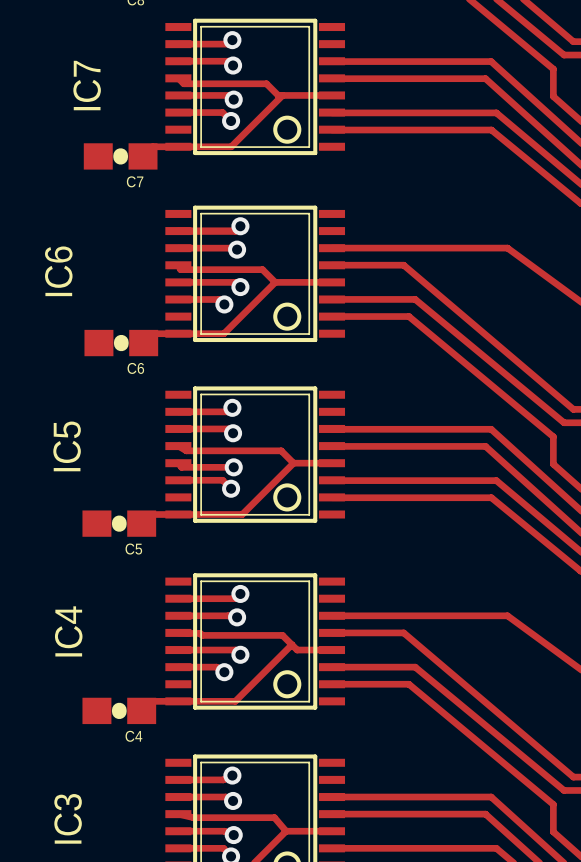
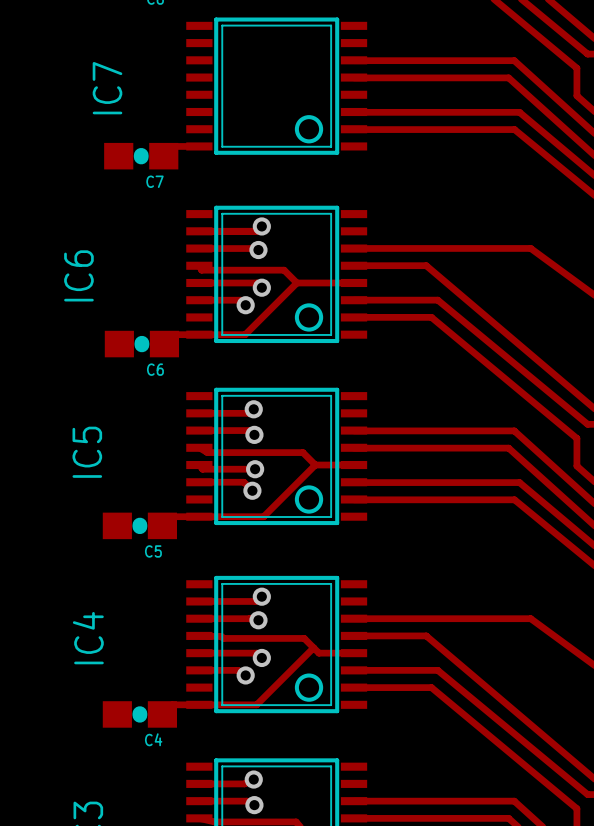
track: (232, 40) (228, 44) (178, 44) -> none
via: (232, 40) -> none
track: (178, 61) (228, 61) (233, 65) -> none
via: (233, 65) -> none
track: (178, 78) (183, 83) (266, 83) (278, 95) (331, 95) -> none
track: (178, 95) (229, 95) (233, 99) -> none
track: (282, 95) (231, 146) (178, 146) -> none
via: (233, 99) -> none
track: (178, 112) (222, 112) (231, 121) -> none
via: (231, 121) -> none

